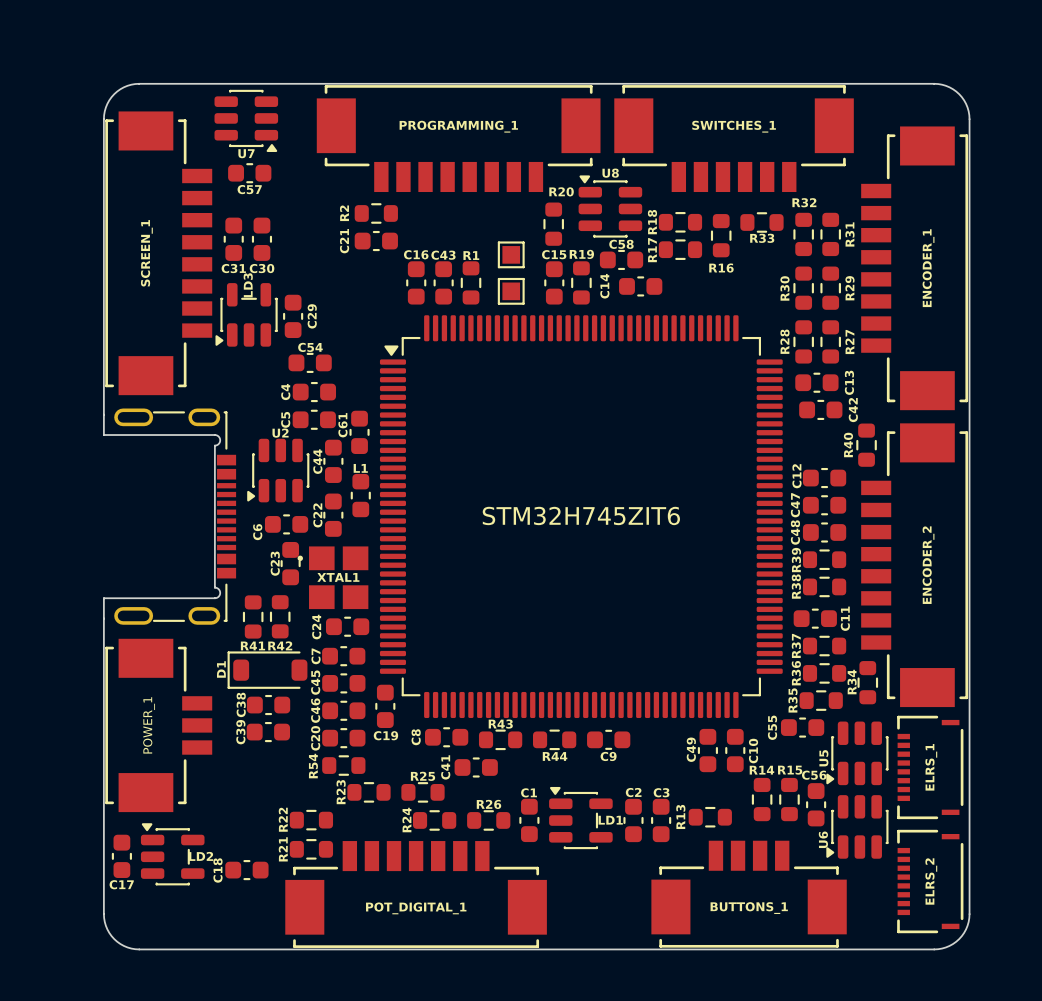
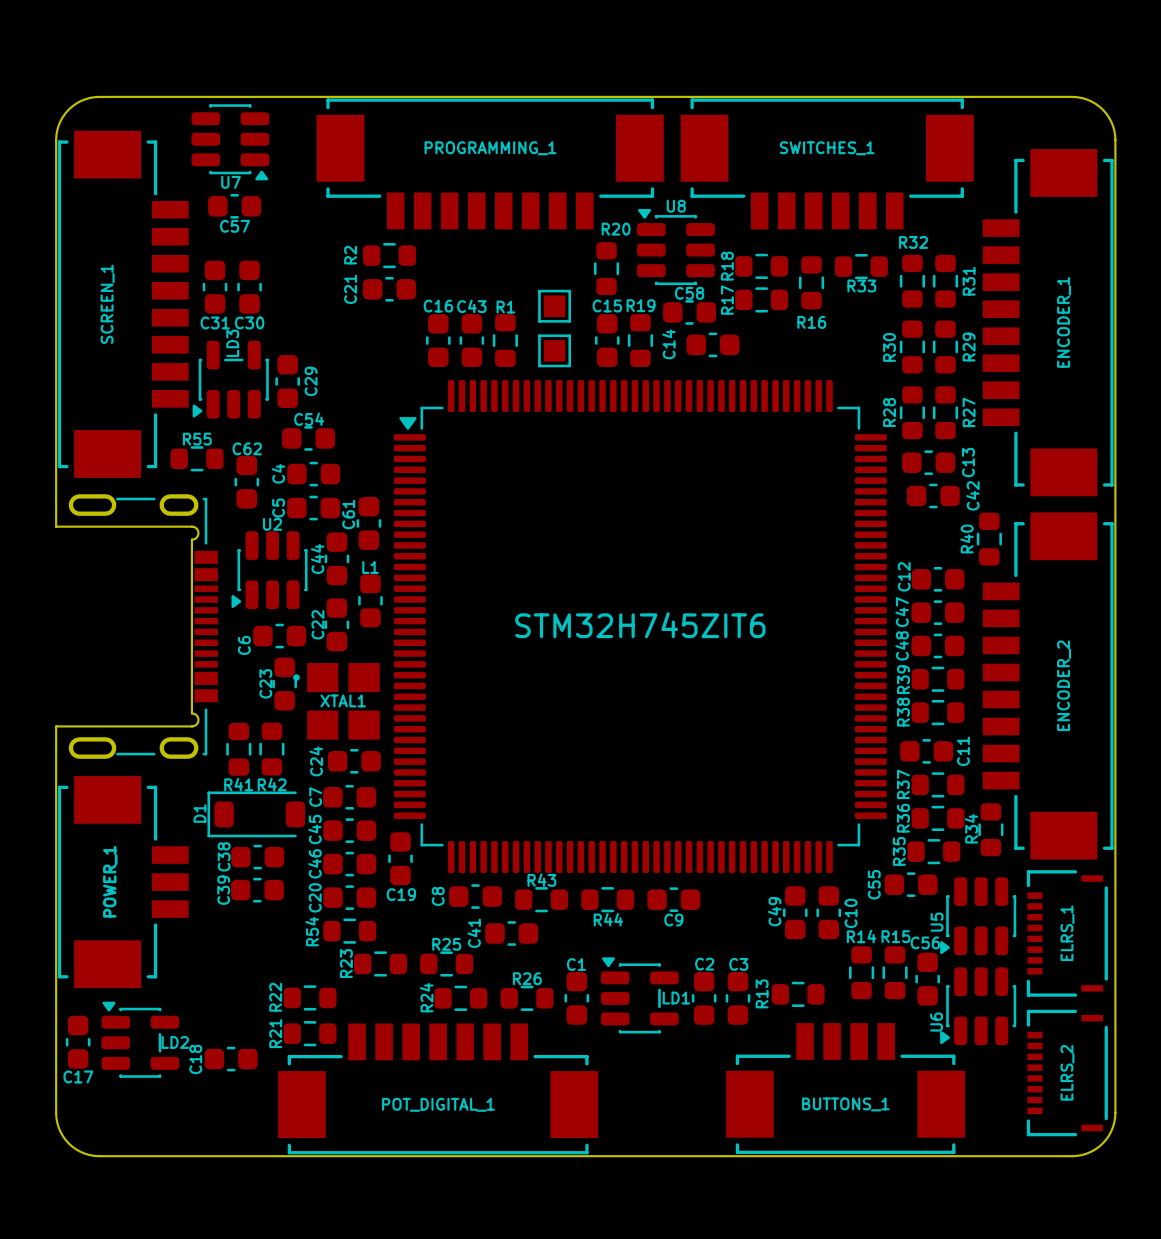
R55: none -> (197, 458)
C62: none -> (246, 482)

